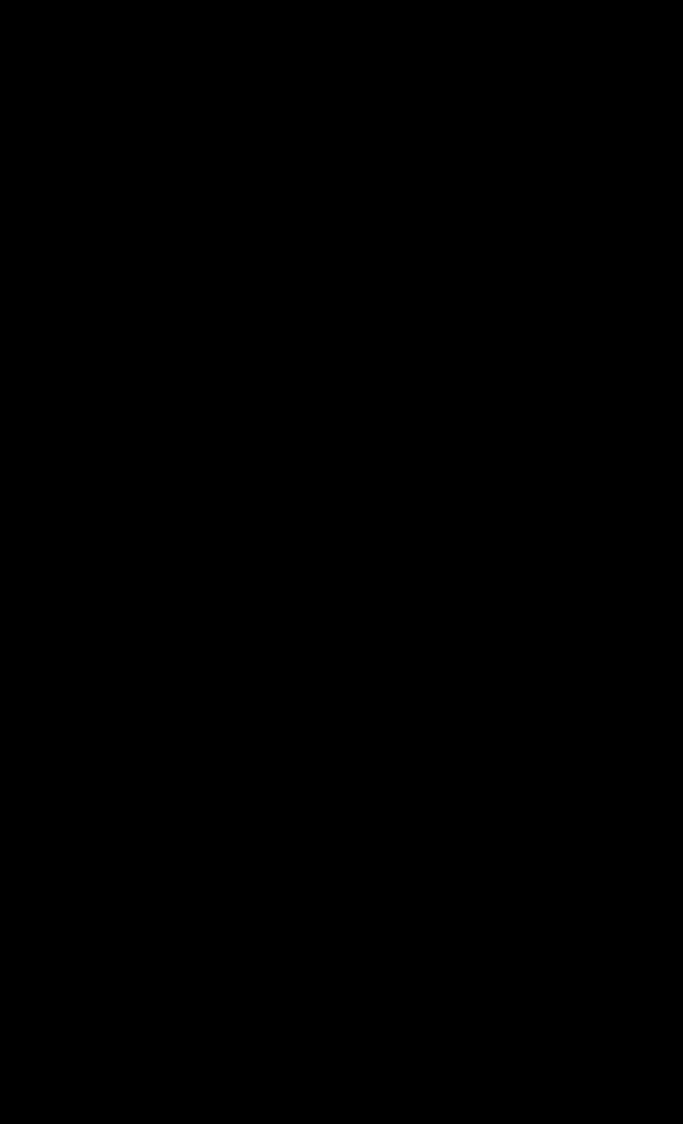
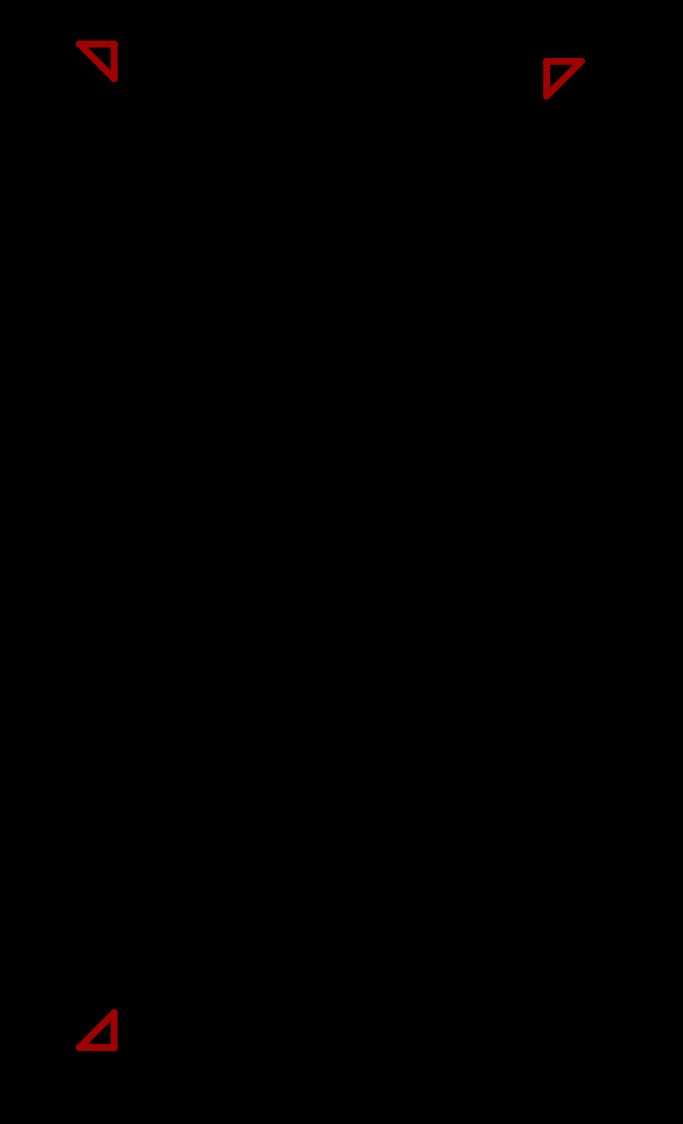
top track: none -> (114, 44) (79, 44) (114, 78) (114, 44)
top track: none -> (581, 61) (546, 95) (546, 61) (581, 61)
top track: none -> (114, 1012) (79, 1047) (114, 1047) (114, 1012)

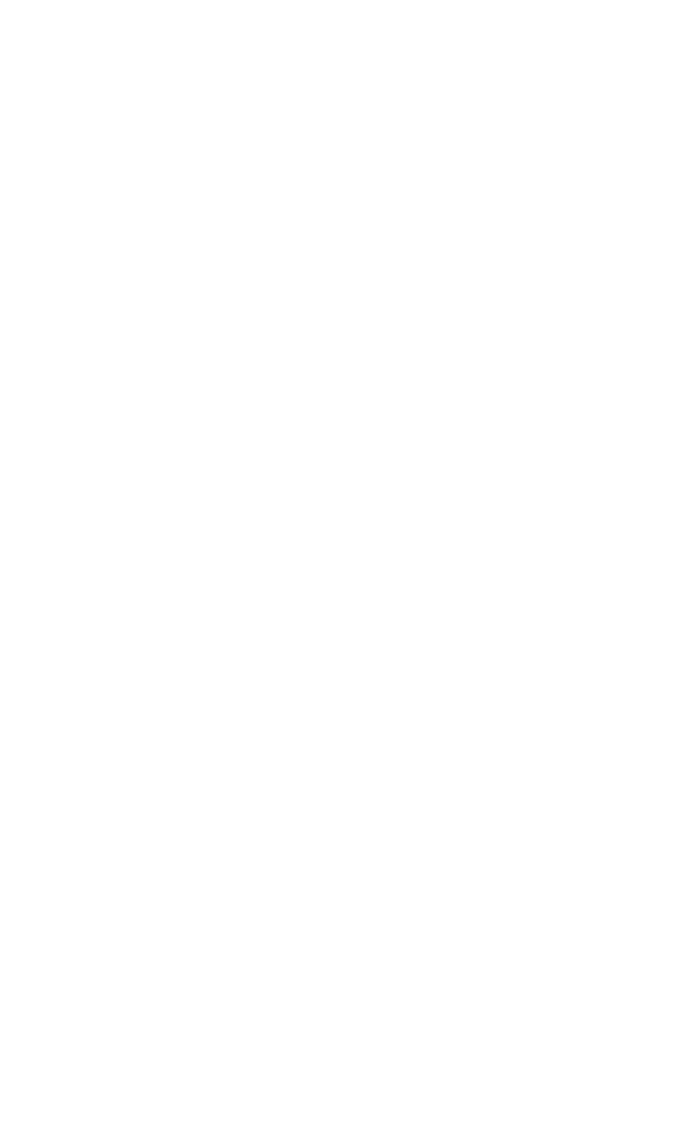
top track: (114, 44) (79, 44) (114, 78) (114, 44) -> none
top track: (581, 61) (546, 95) (546, 61) (581, 61) -> none
top track: (114, 1012) (79, 1047) (114, 1047) (114, 1012) -> none

